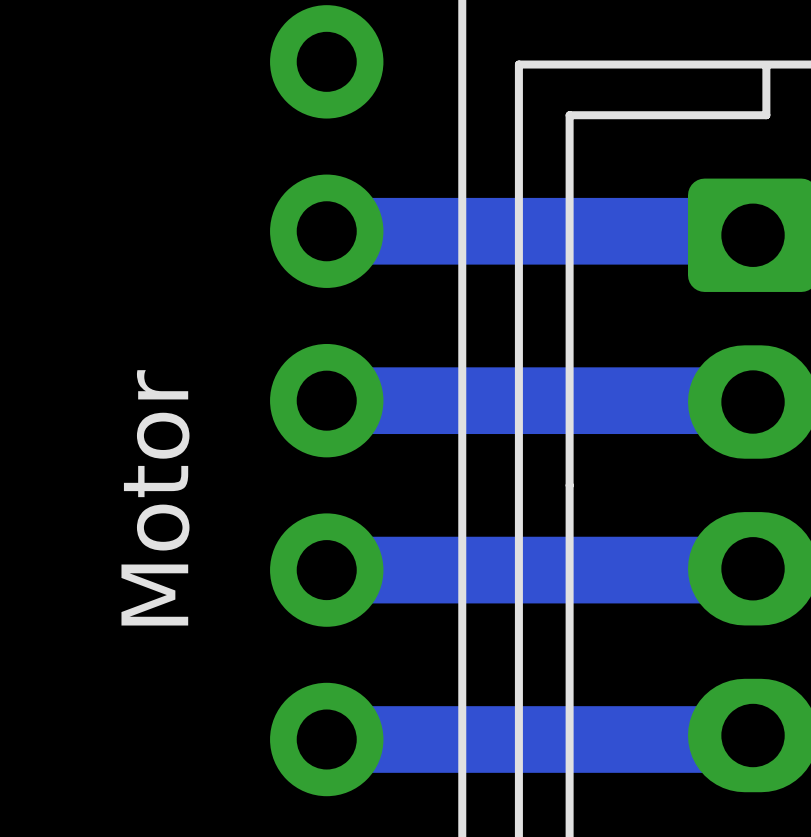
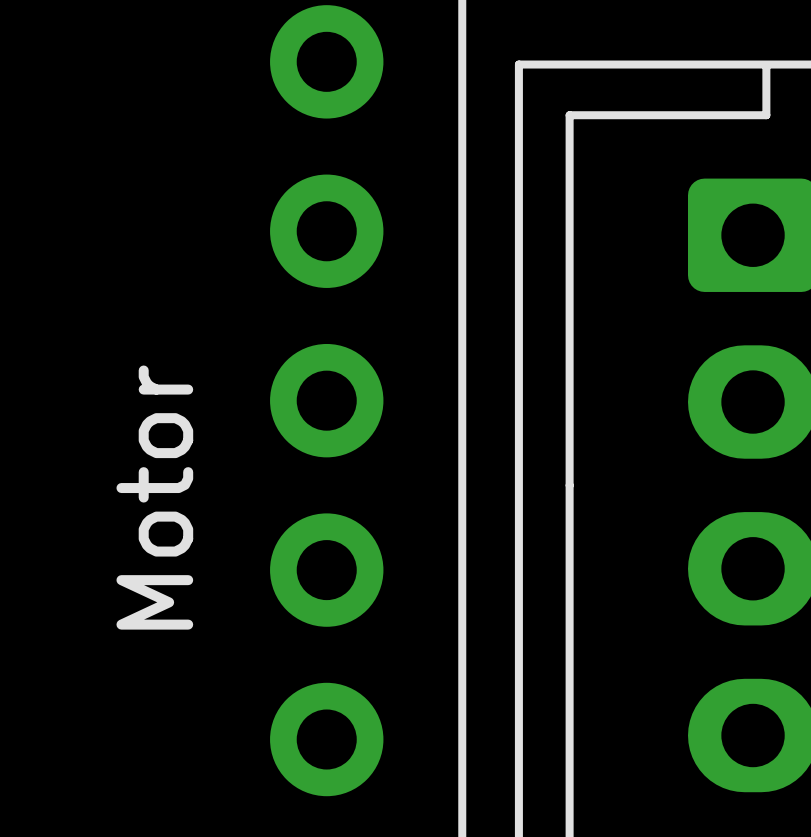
bottom track: (326, 231) (749, 231) (753, 235) -> none
bottom track: (326, 400) (753, 402) -> none
bottom track: (753, 568) (326, 570) -> none
bottom track: (753, 735) (749, 739) (326, 739) -> none

